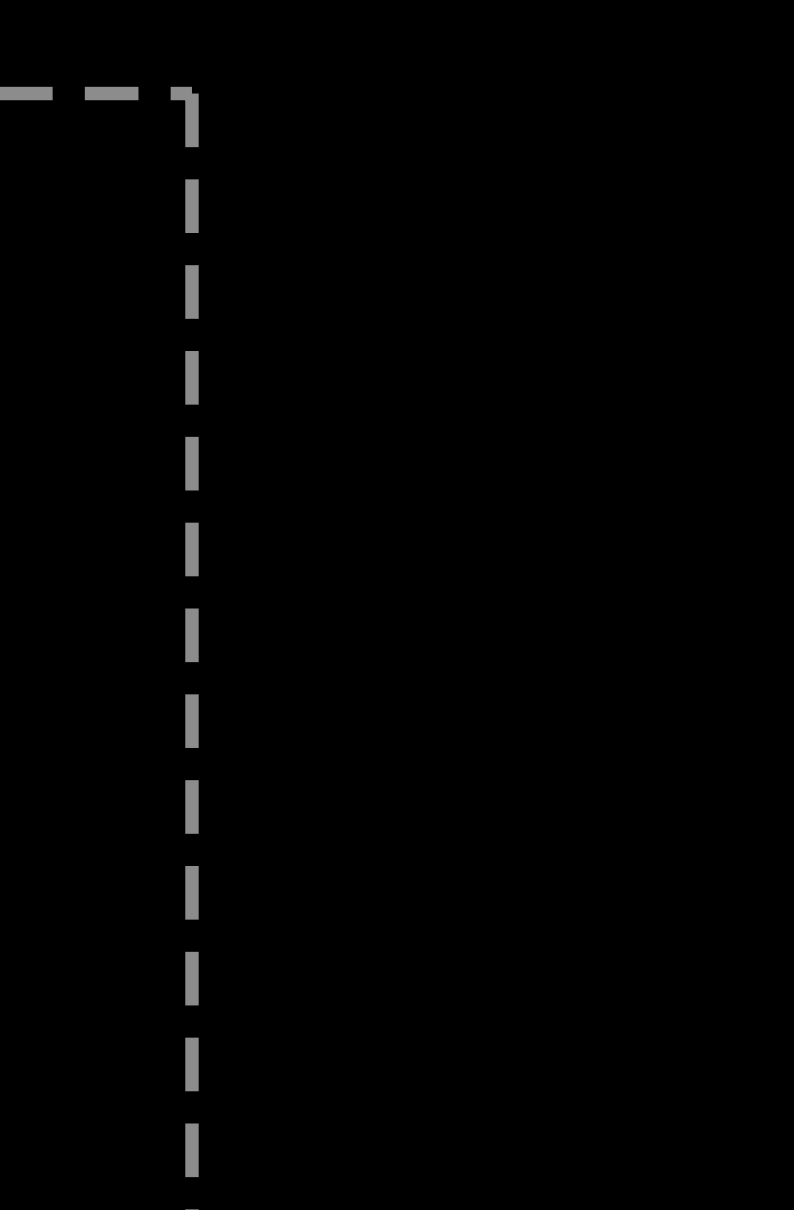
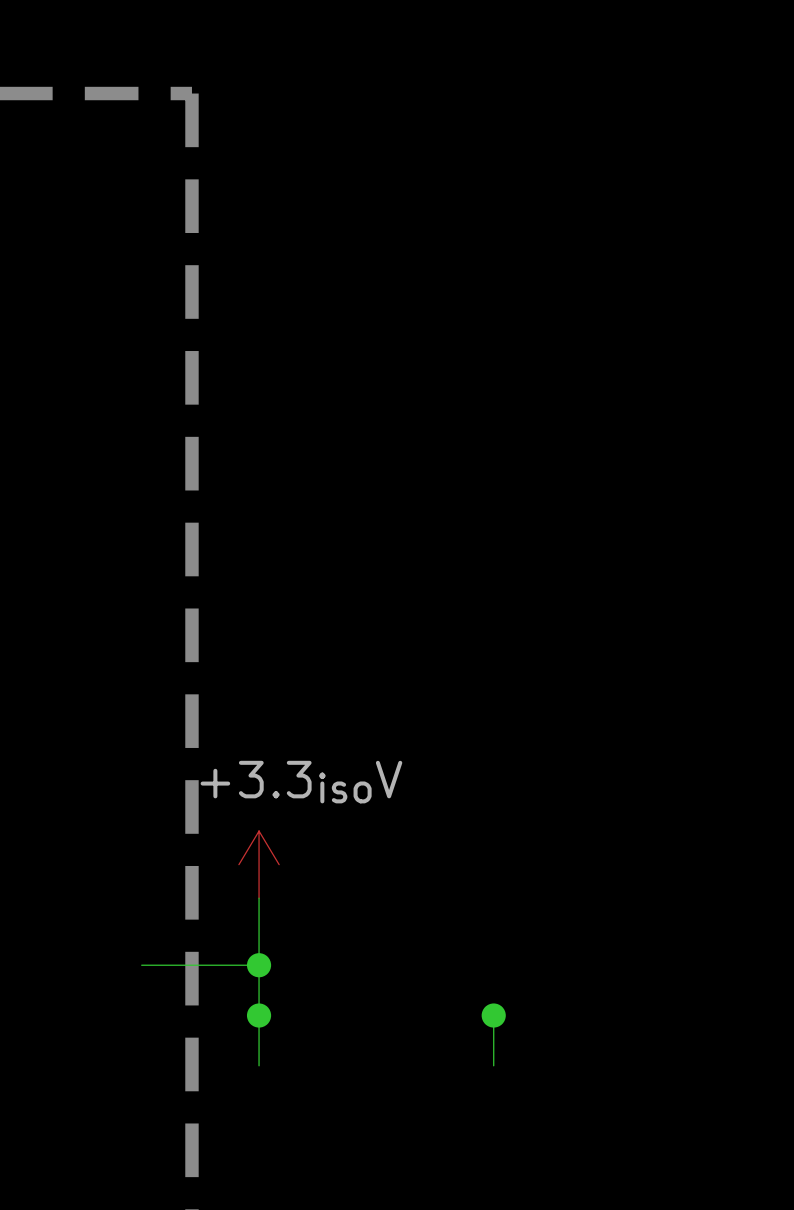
power symbol: none -> +3.3isoV (259, 864)
wire: none -> (259, 898) (259, 1065)
wire: none -> (141, 965) (259, 965)
junction: none -> (259, 965)
junction: none -> (259, 1015)
wire: none -> (493, 1015) (493, 1065)
junction: none -> (493, 1015)

